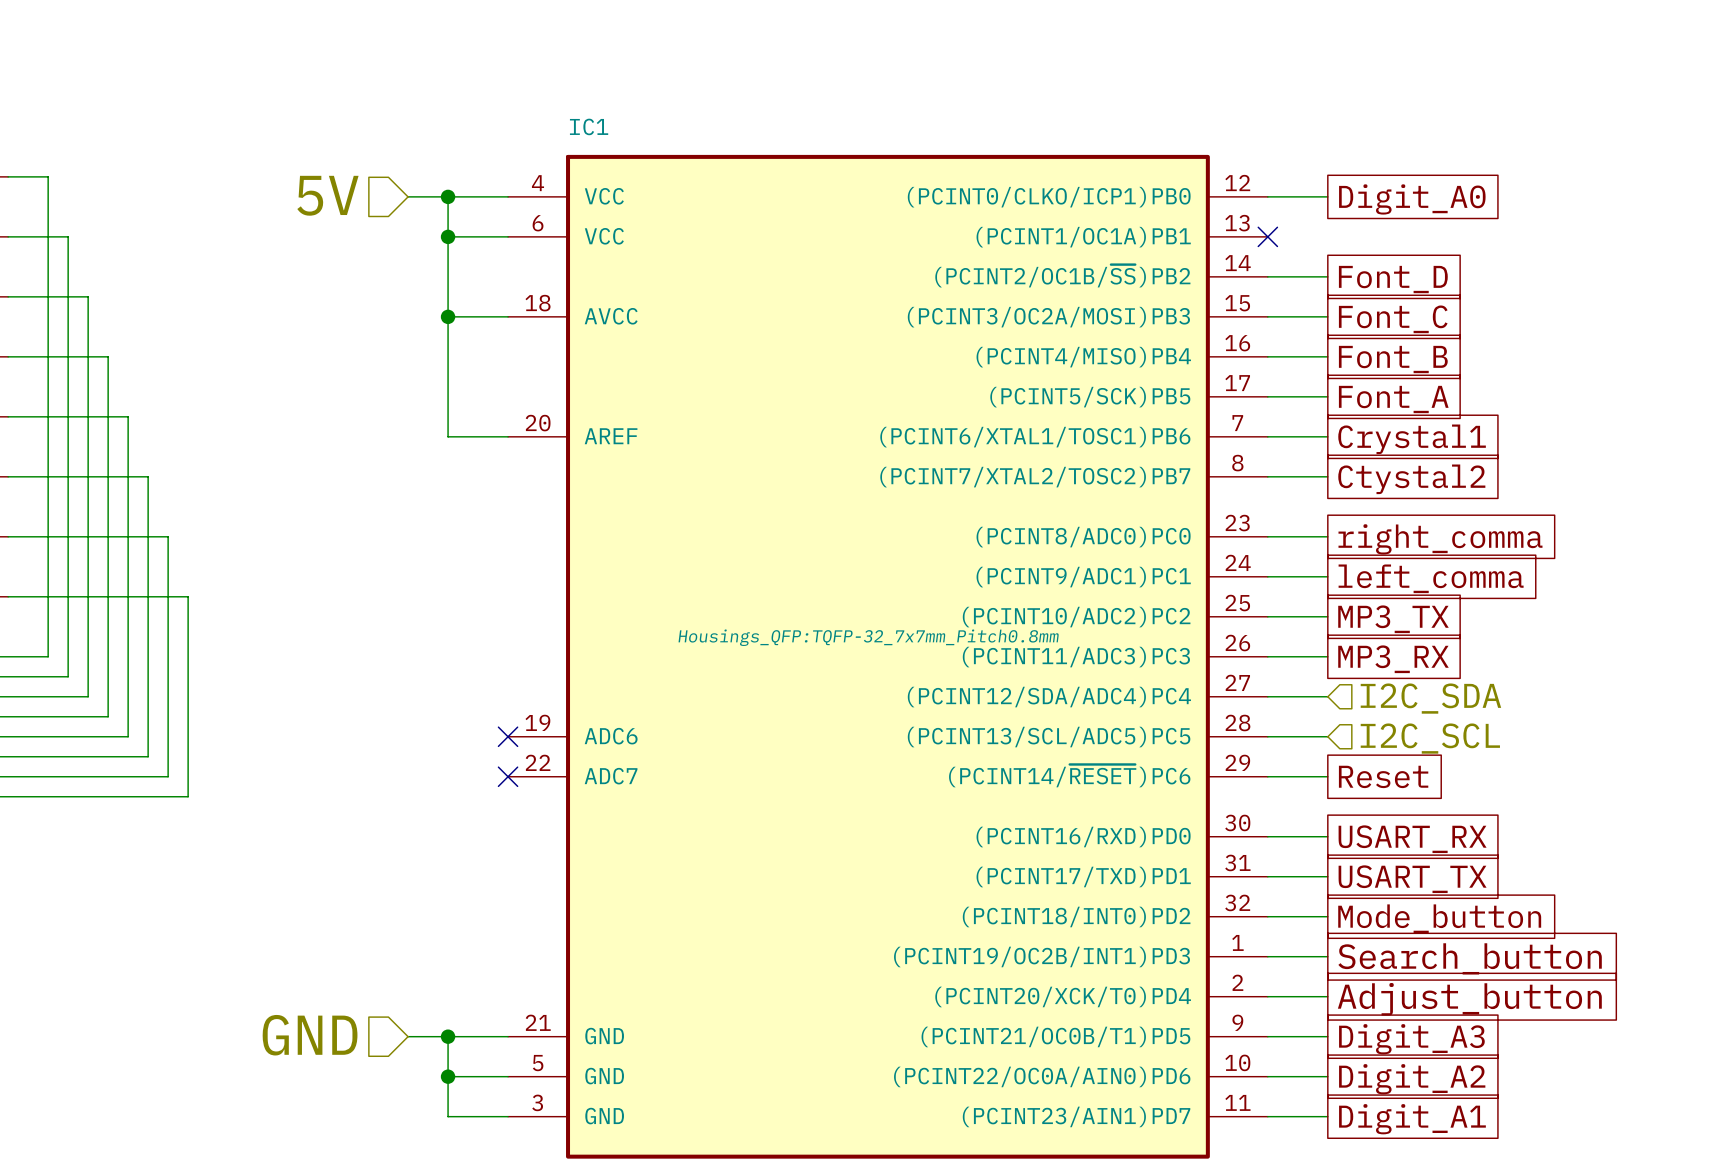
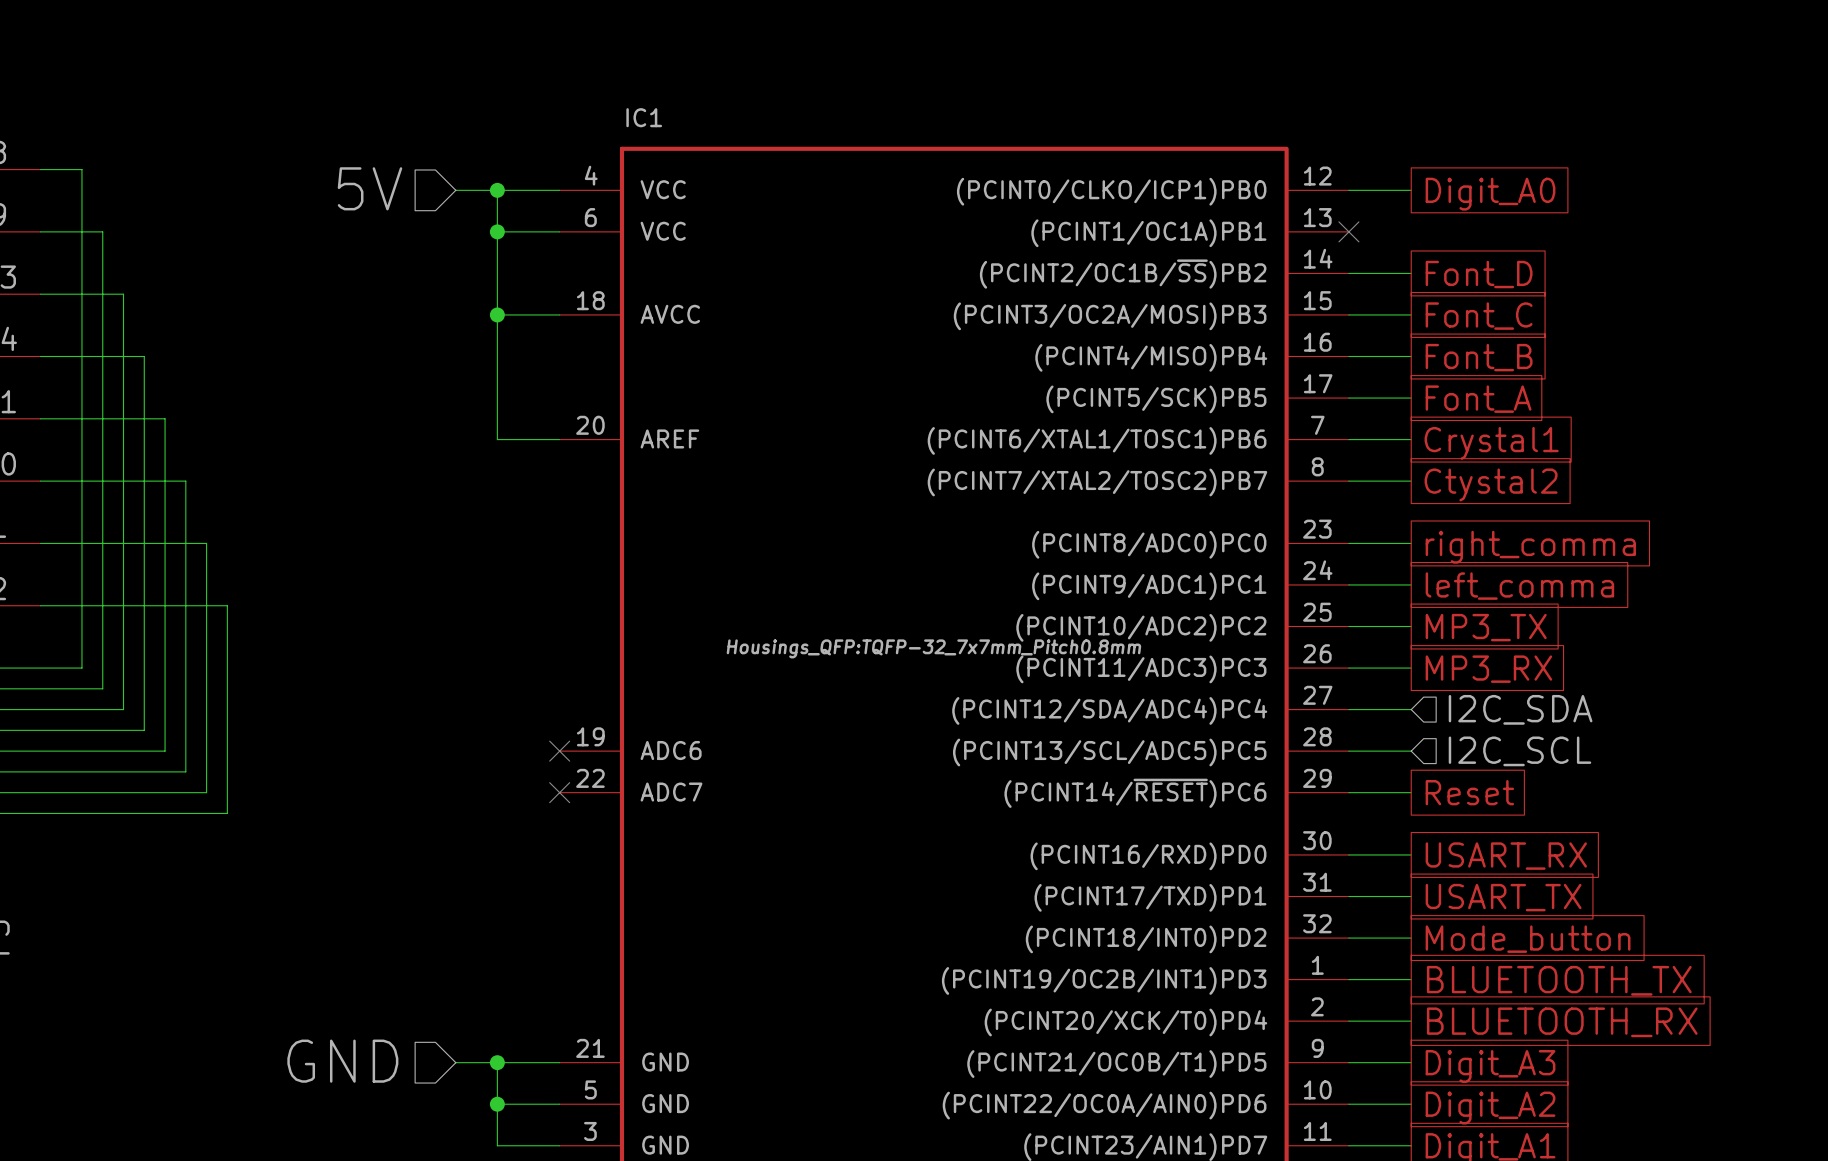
global label: Search_button (1470, 958) -> BLUETOOTH_TX (1559, 980)
global label: Adjust_button (1469, 999) -> BLUETOOTH_RX (1562, 1022)

